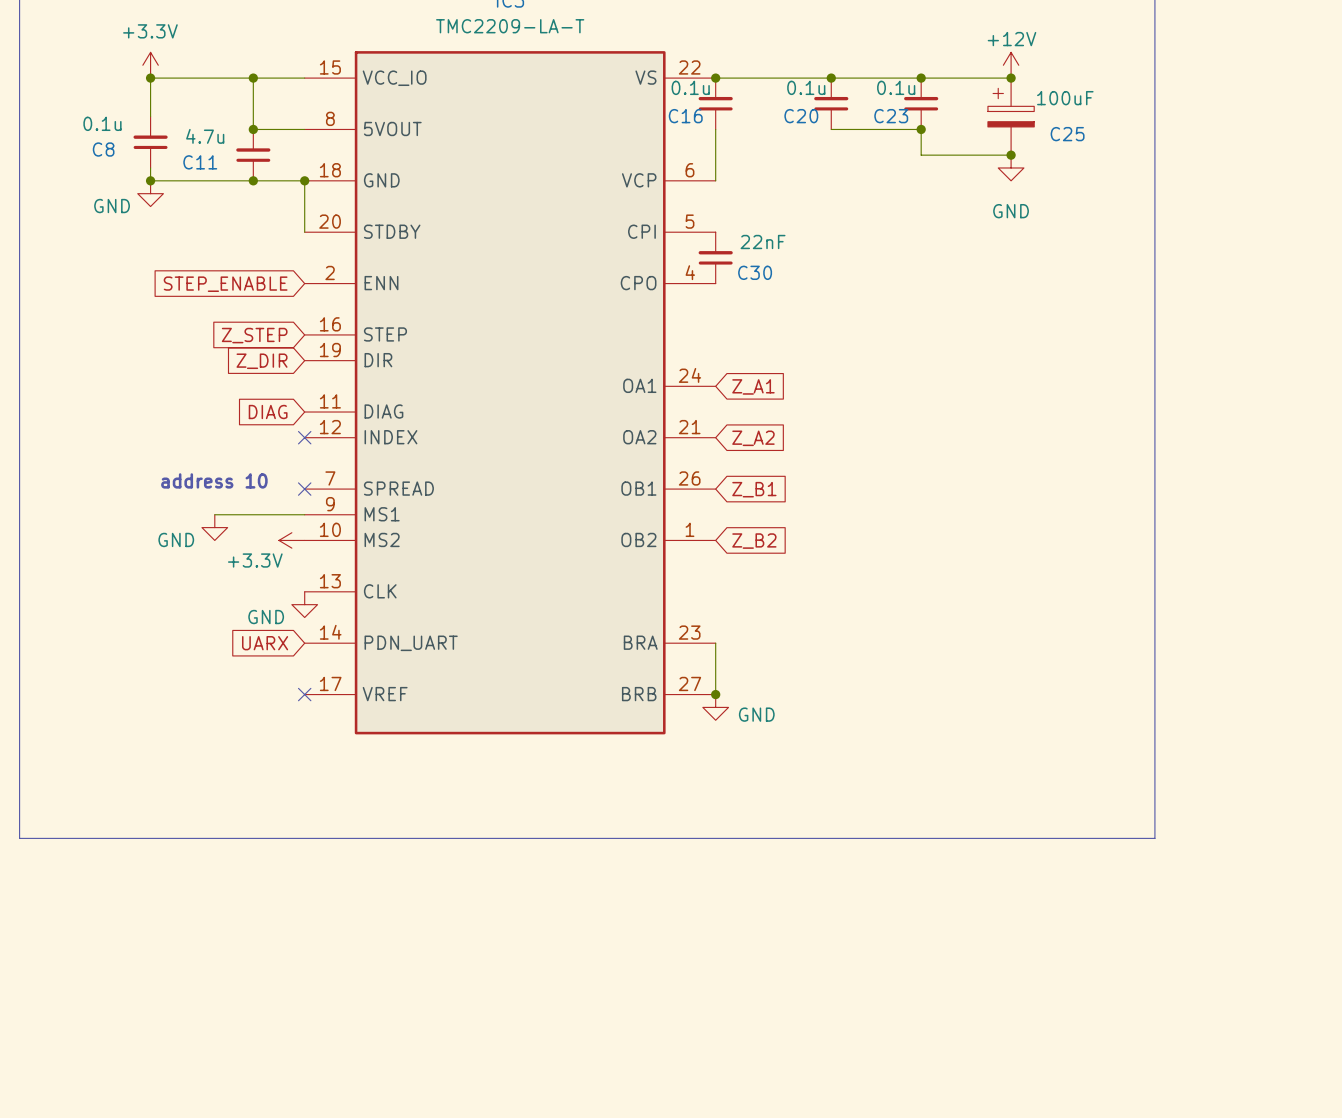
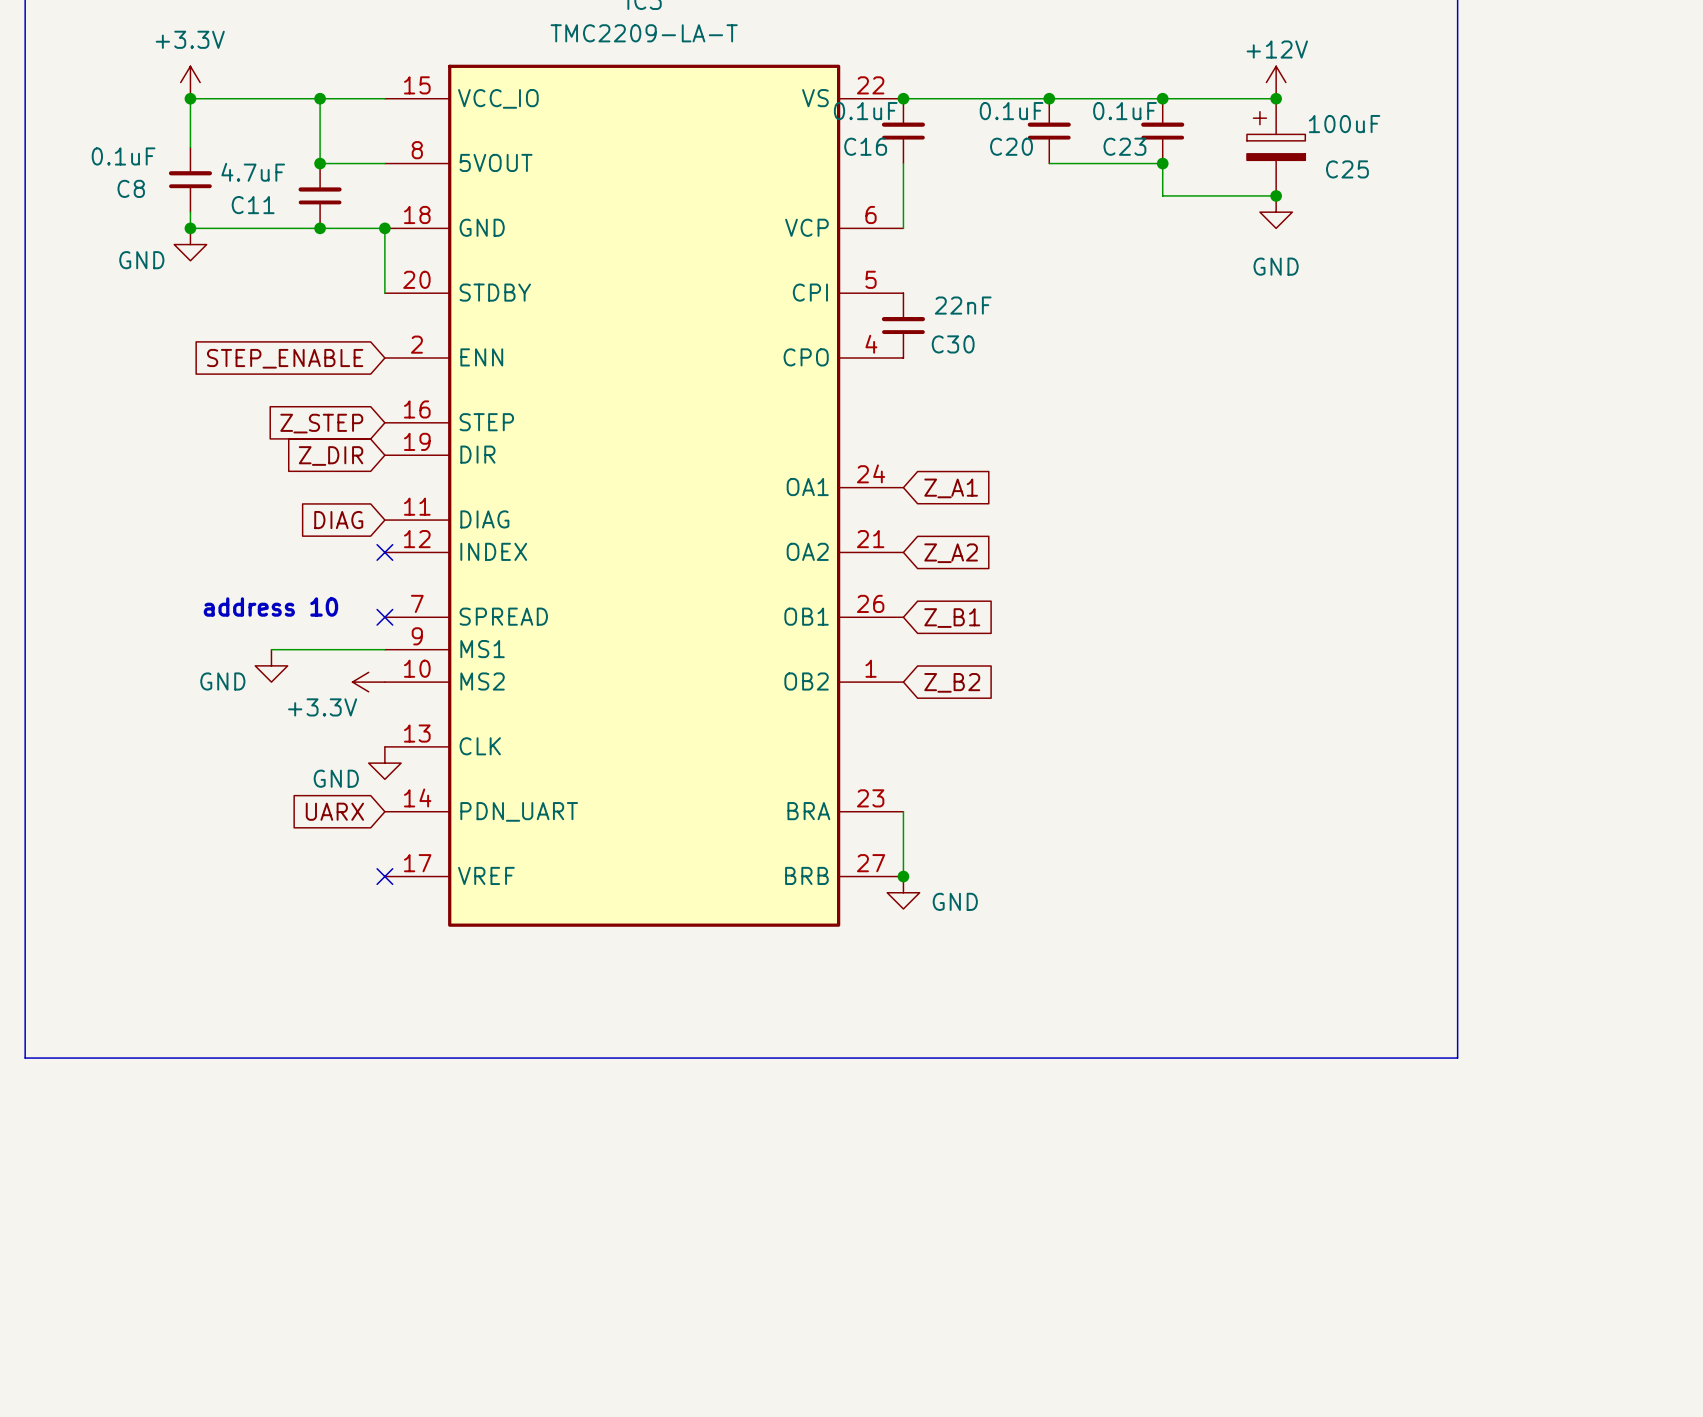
C16 value: 0.1u (690, 87) -> 0.1uF (865, 111)
C20 value: 0.1u (806, 87) -> 0.1uF (1011, 111)
C23 value: 0.1u (896, 87) -> 0.1uF (1125, 111)
C8 value: 0.1u (102, 123) -> 0.1uF (123, 156)
C11 value: 4.7u (205, 136) -> 4.7uF (253, 172)

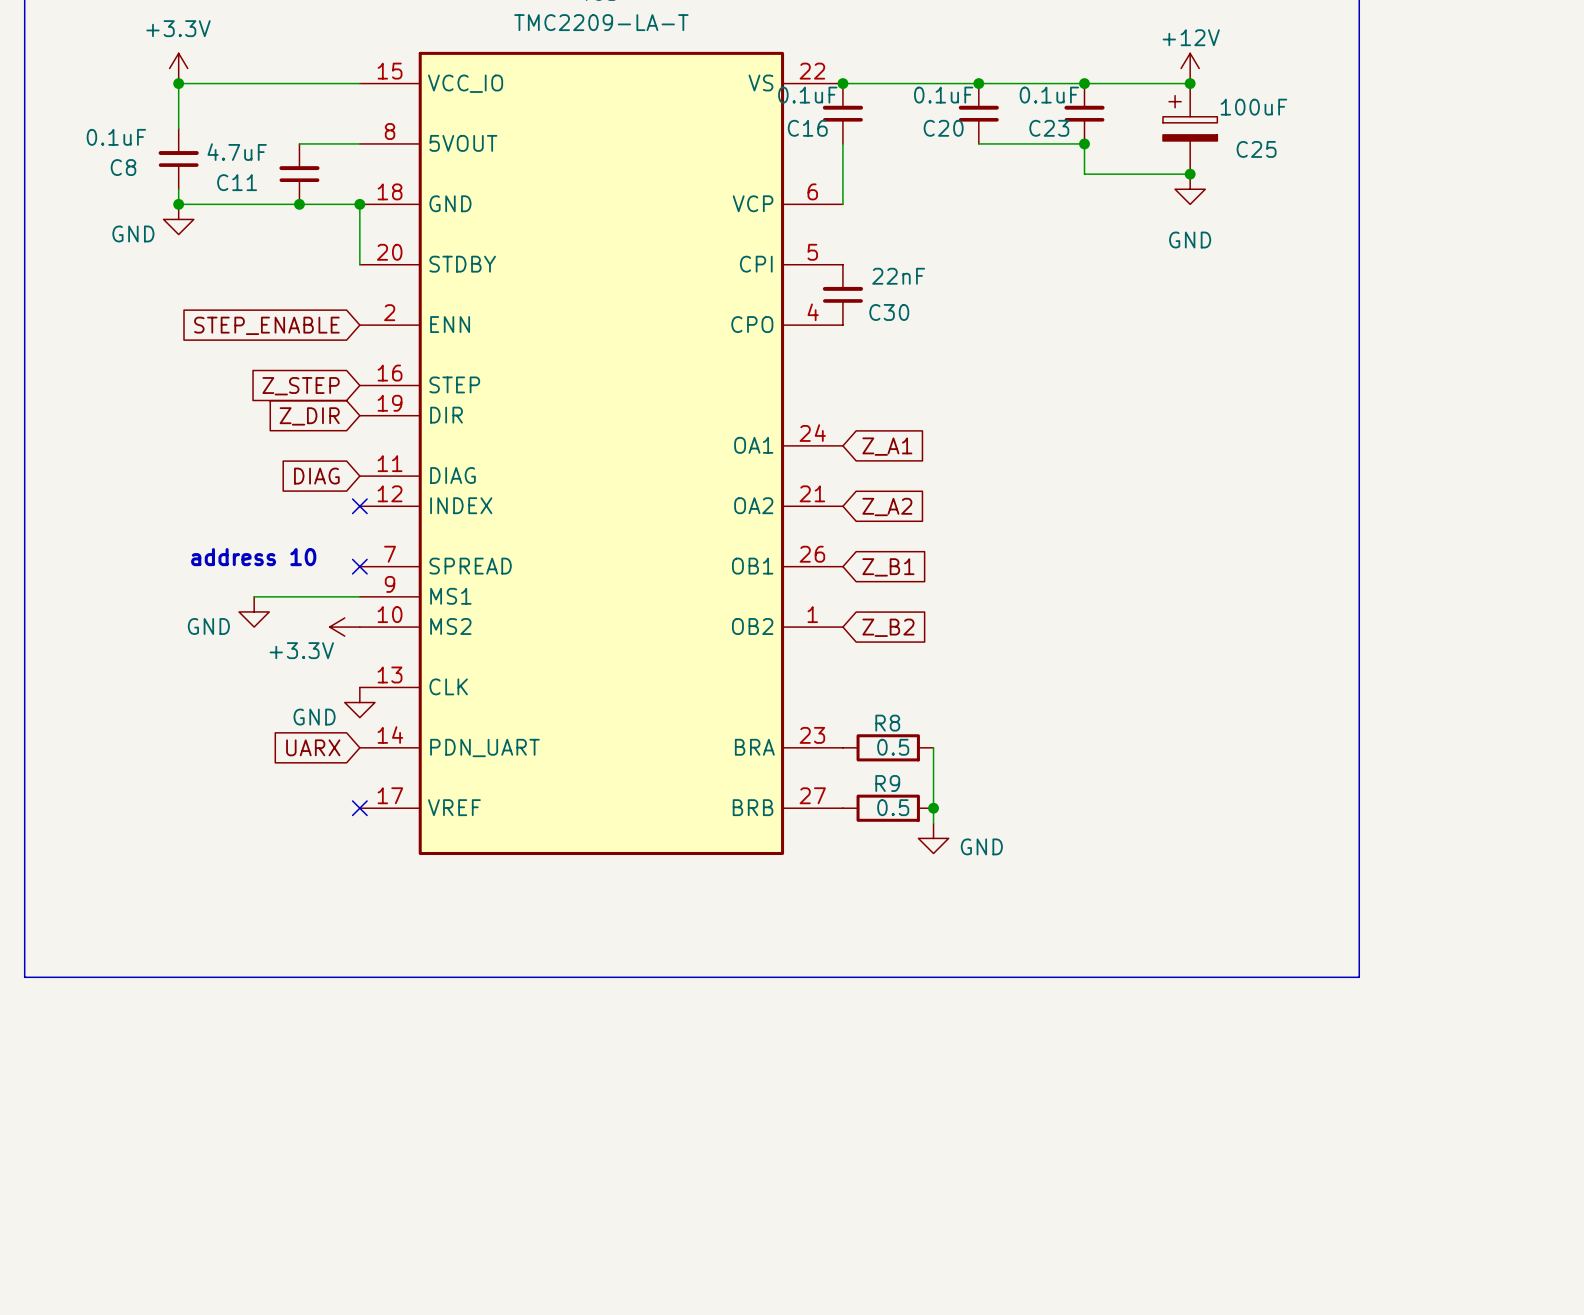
wire: (320, 98) (320, 163) -> none
junction: (320, 98) -> none
junction: (320, 163) -> none
wire: (903, 811) (903, 876) -> none
R8: none -> 0.5 (888, 747)
wire: none -> (933, 747) (933, 823)
junction: (903, 876) -> none
R9: none -> 0.5 (888, 808)
junction: none -> (933, 808)
power symbol position: GND (903, 892) -> GND (933, 838)

